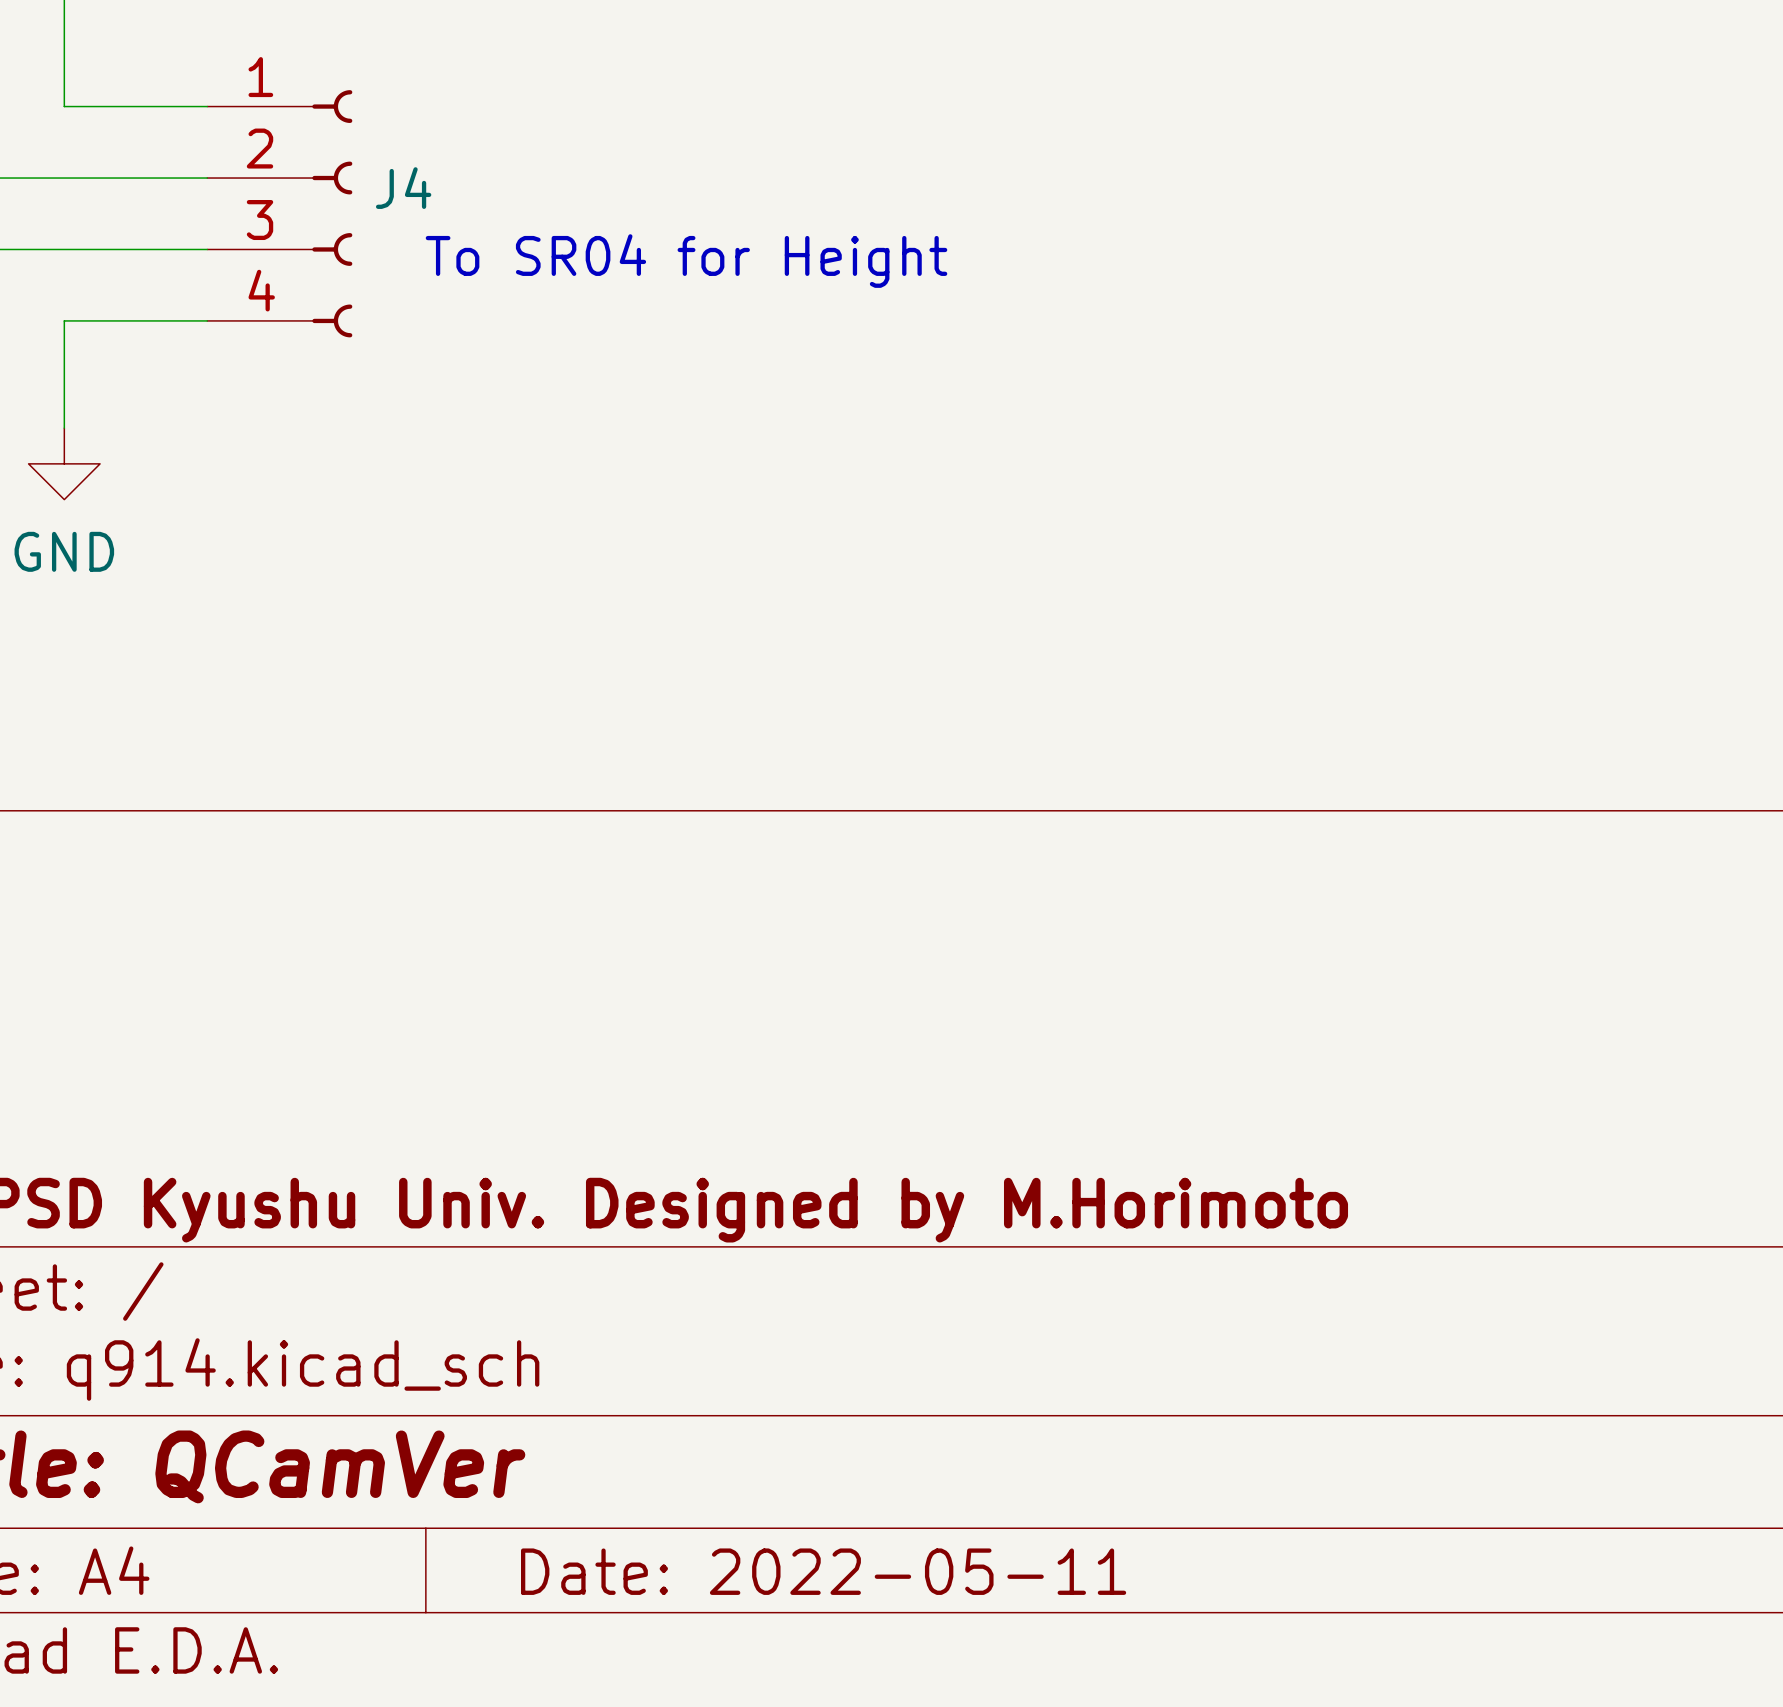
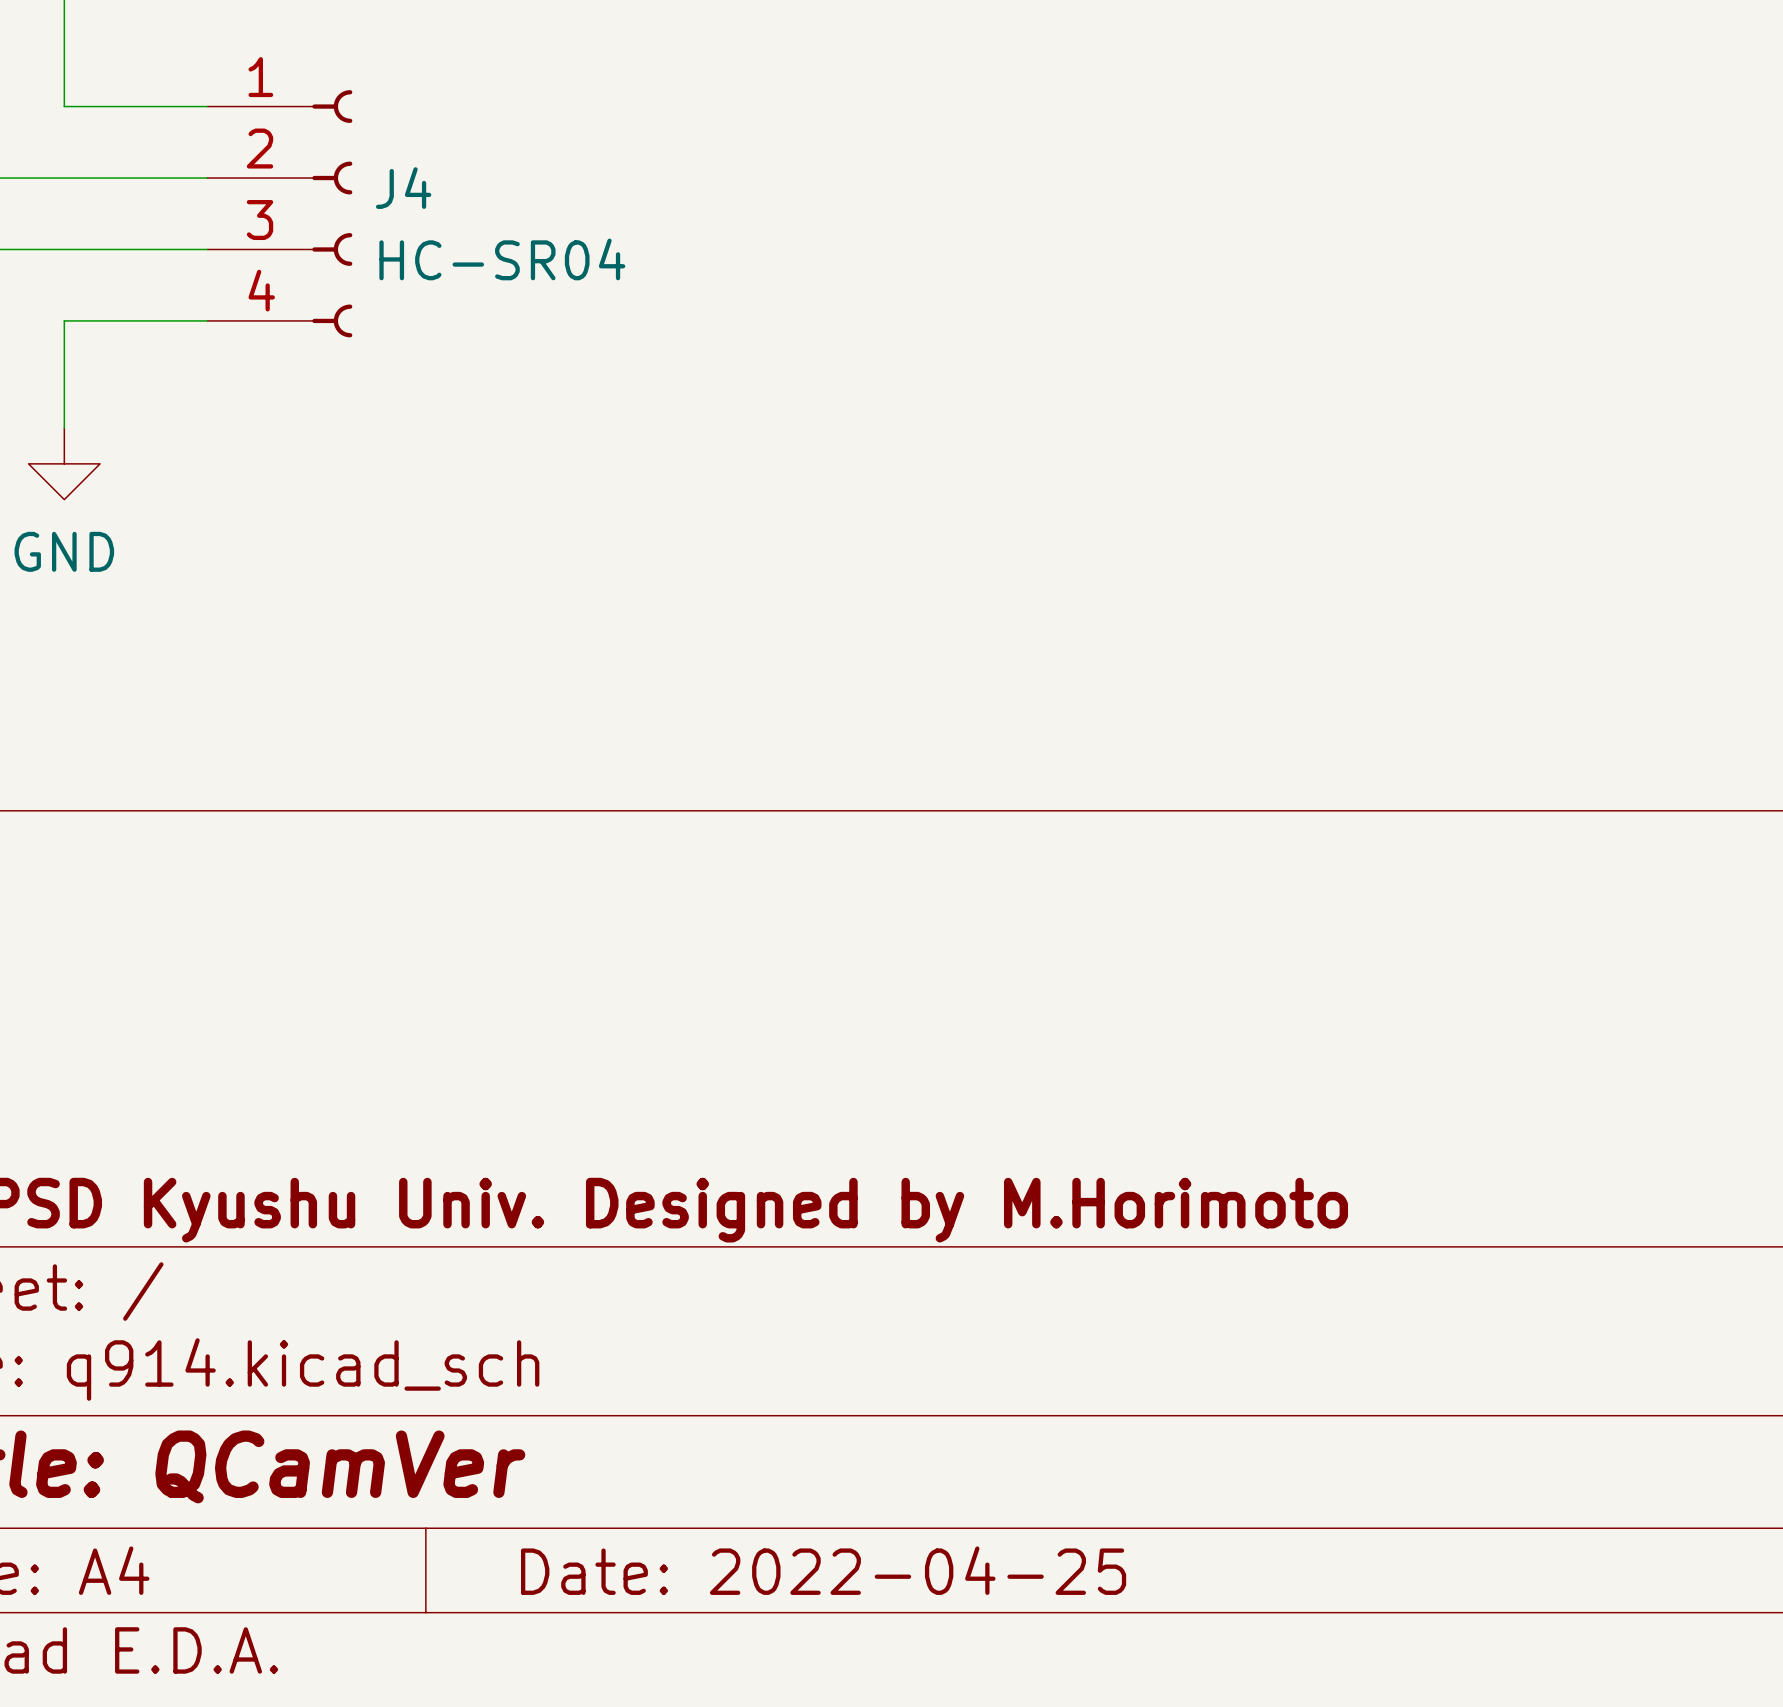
J4 value: none -> HC-SR04 (502, 259)
text: To SR04 for Height (686, 261) -> none
title block: Date: 2022-05-11 (823, 1571) -> Date: 2022-04-25 (823, 1570)

